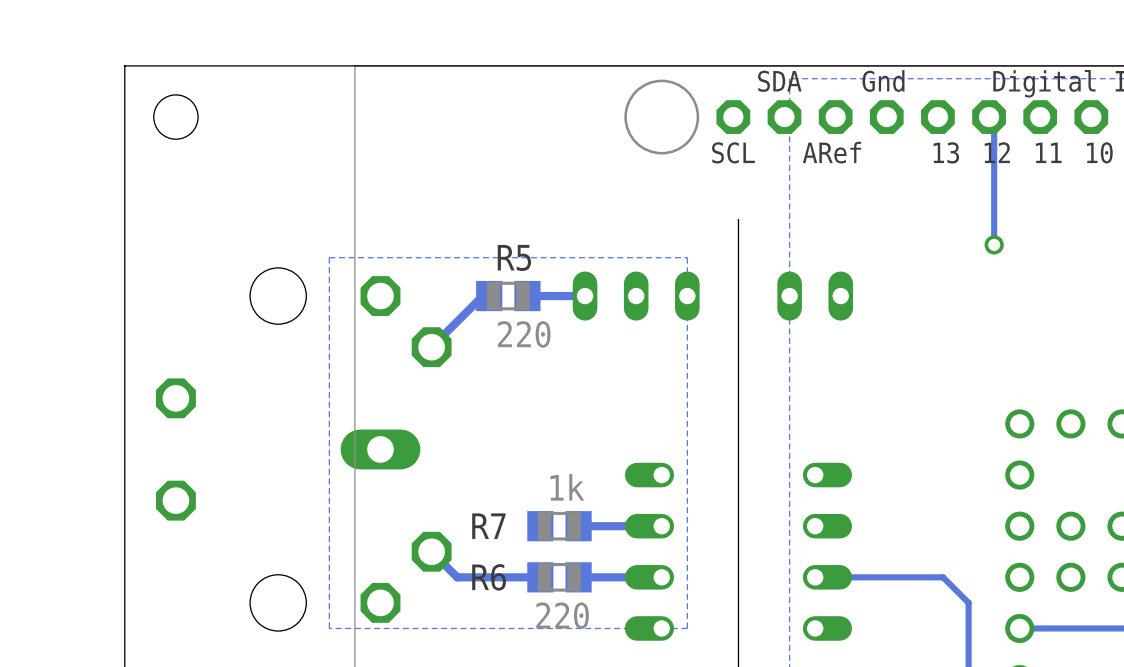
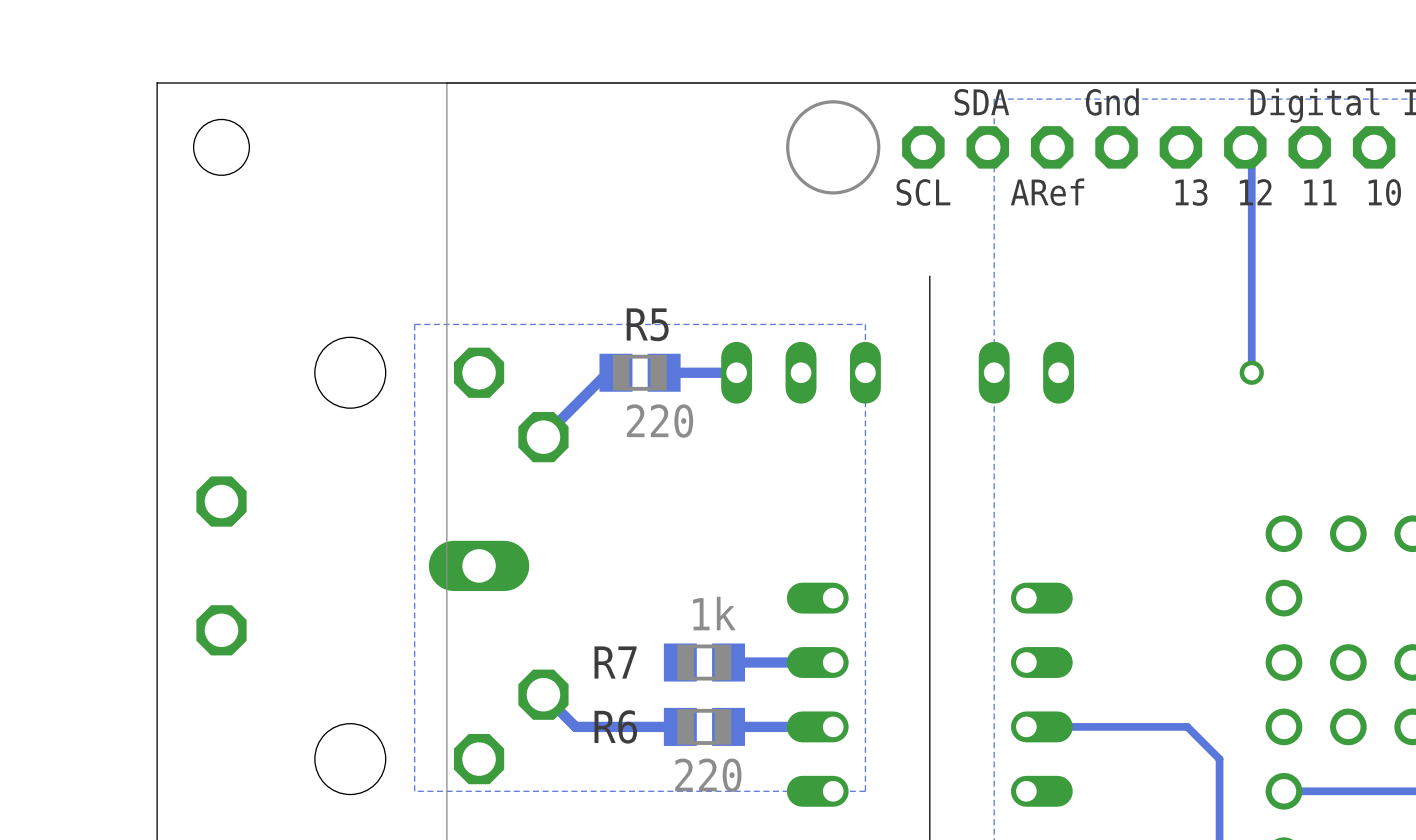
track: none -> (1251, 308) (1251, 372)
via position: (994, 244) -> (1251, 372)

